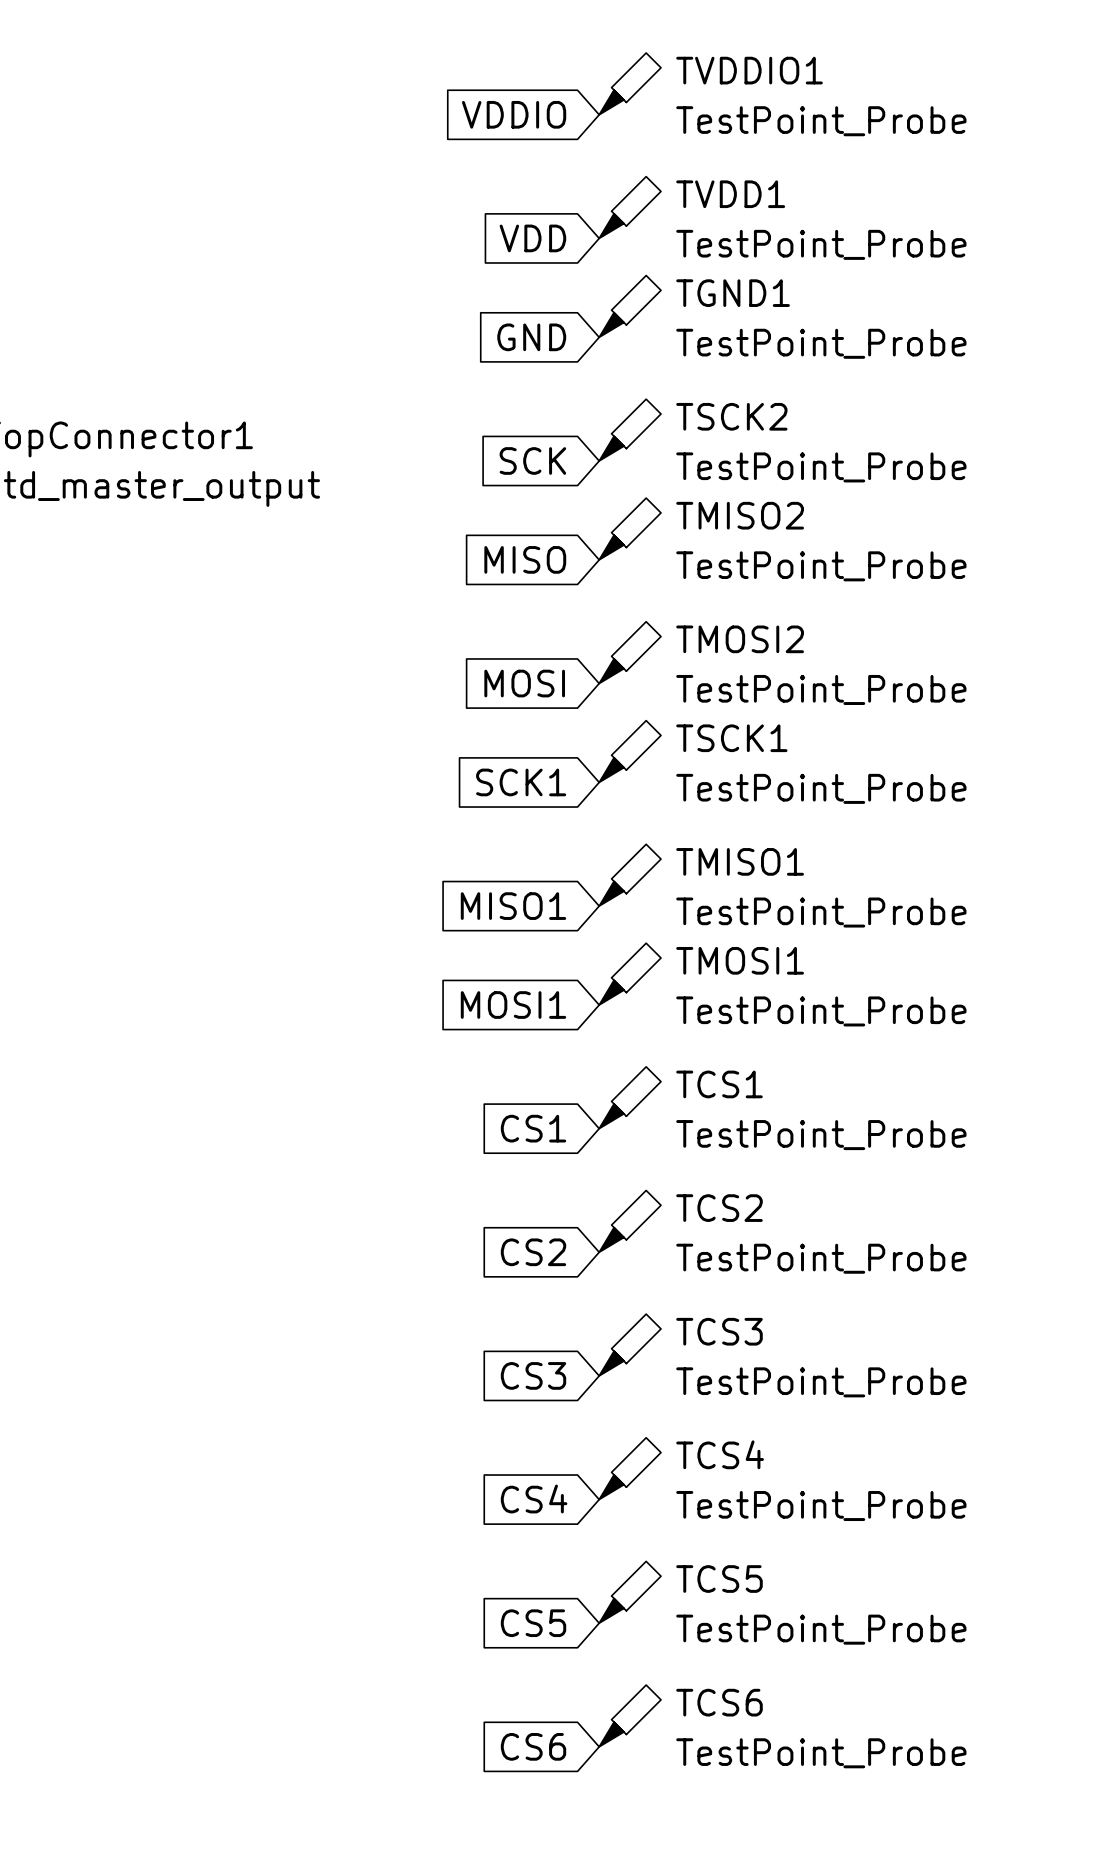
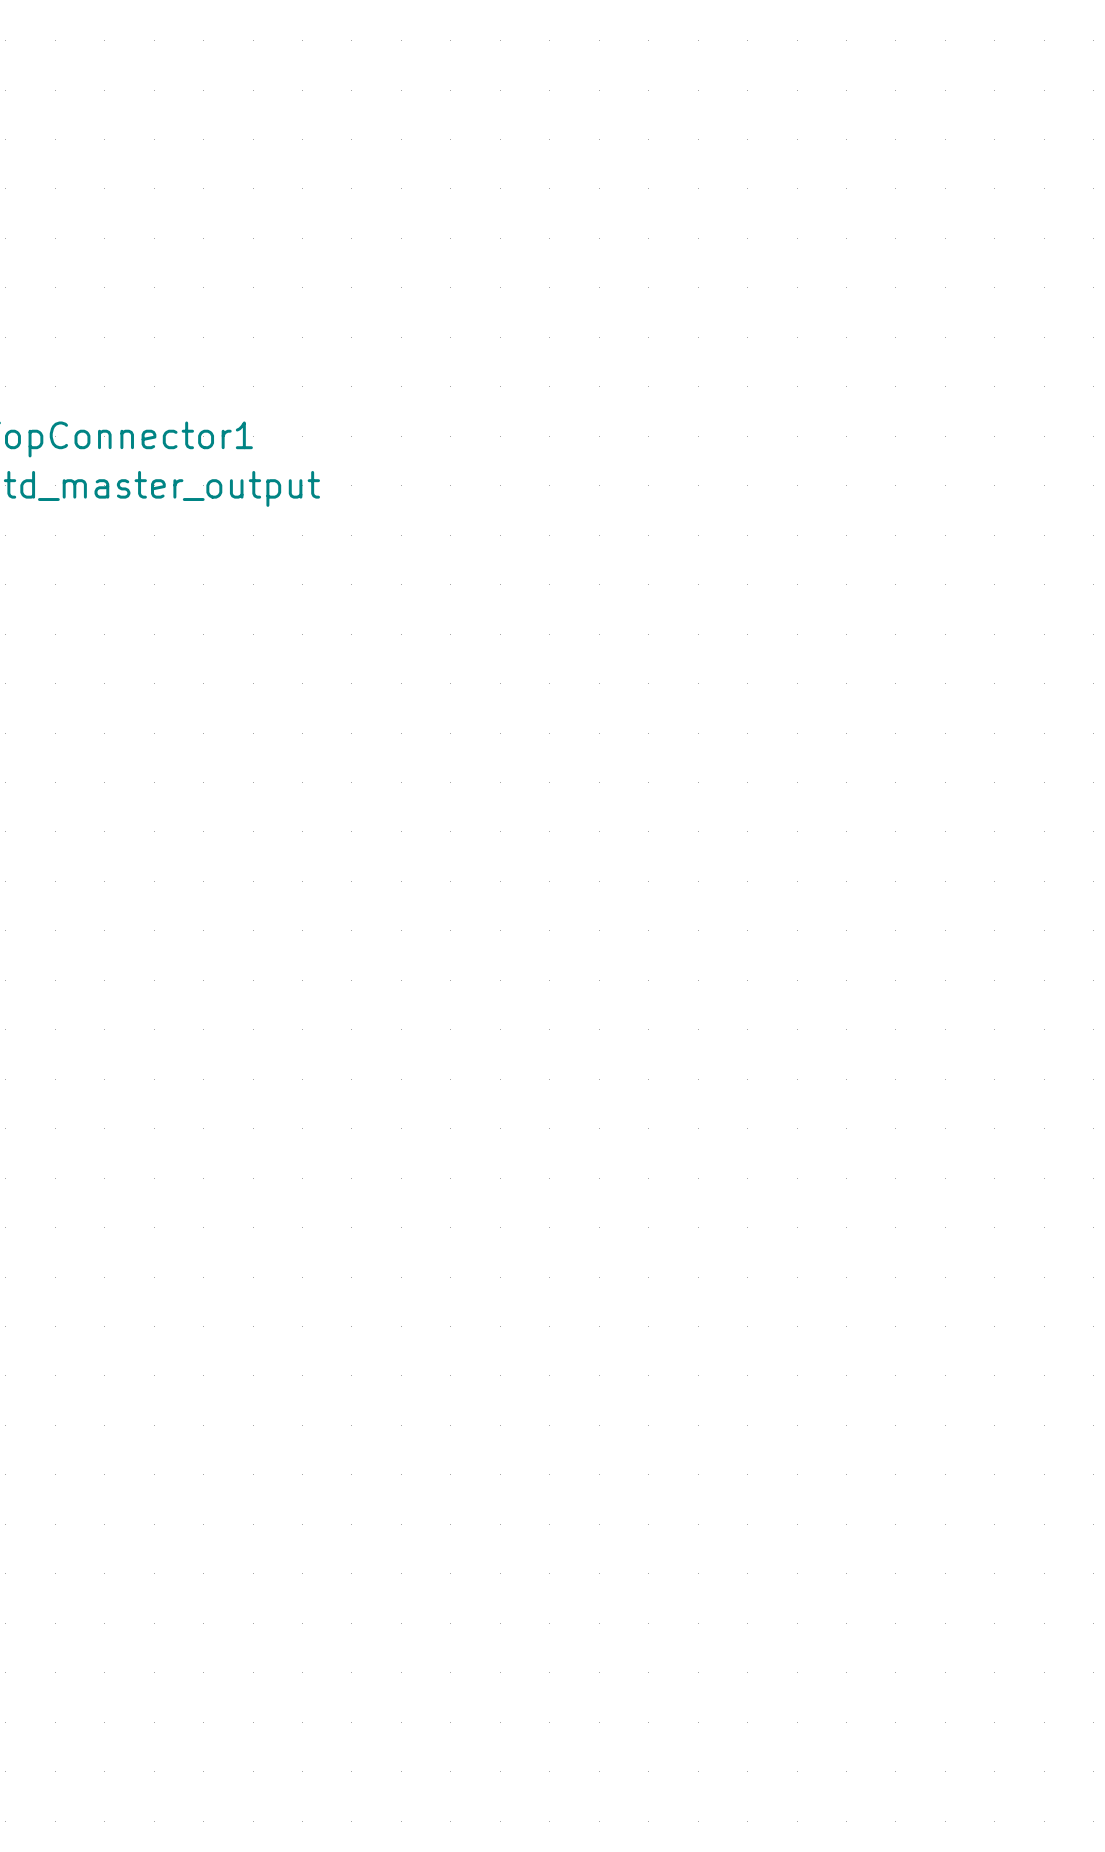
TVDDIO1: TestPoint_Probe (630, 83) -> none
global label: VDDIO (514, 114) -> none
TVDD1: TestPoint_Probe (630, 207) -> none
global label: VDD (532, 238) -> none
TGND1: TestPoint_Probe (630, 306) -> none
global label: GND (531, 337) -> none
TSCK2: TestPoint_Probe (630, 430) -> none
global label: SCK (532, 460) -> none
TMISO2: TestPoint_Probe (630, 528) -> none
global label: MISO (525, 559) -> none
TMOSI2: TestPoint_Probe (630, 652) -> none
global label: MOSI (524, 683) -> none
TSCK1: TestPoint_Probe (630, 751) -> none
global label: SCK1 (521, 782) -> none
TMISO1: TestPoint_Probe (630, 875) -> none
global label: MISO1 (513, 906) -> none
TMOSI1: TestPoint_Probe (630, 974) -> none
global label: MOSI1 (513, 1005) -> none
TCS1: TestPoint_Probe (630, 1097) -> none
global label: CS1 (533, 1128) -> none
TCS2: TestPoint_Probe (630, 1221) -> none
global label: CS2 (533, 1252) -> none
TCS3: TestPoint_Probe (630, 1345) -> none
global label: CS3 (533, 1375) -> none
TCS4: TestPoint_Probe (630, 1468) -> none
global label: CS4 (534, 1498) -> none
TCS5: TestPoint_Probe (630, 1592) -> none
global label: CS5 (533, 1623) -> none
TCS6: TestPoint_Probe (630, 1715) -> none
global label: CS6 (533, 1746) -> none

